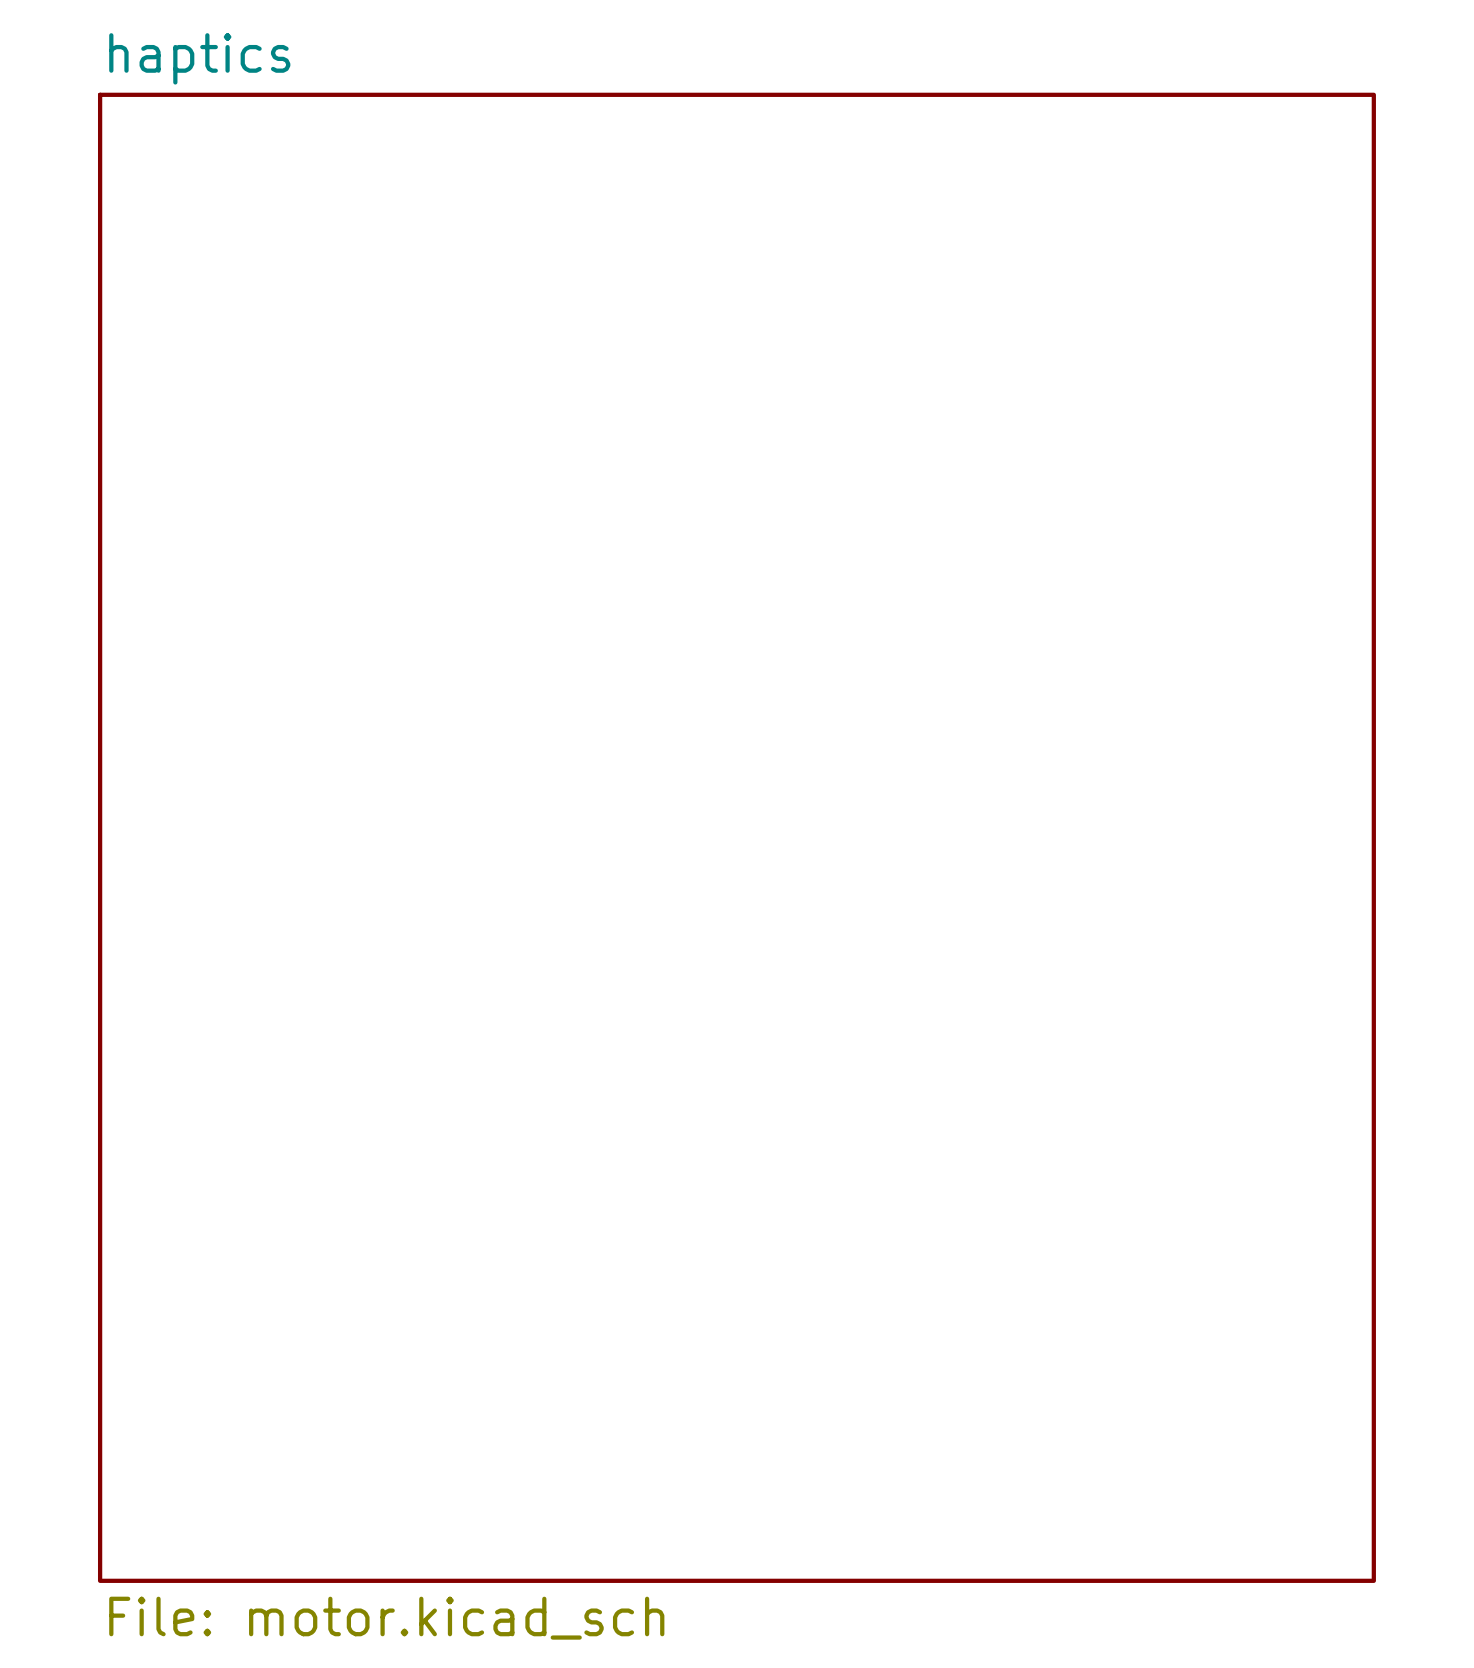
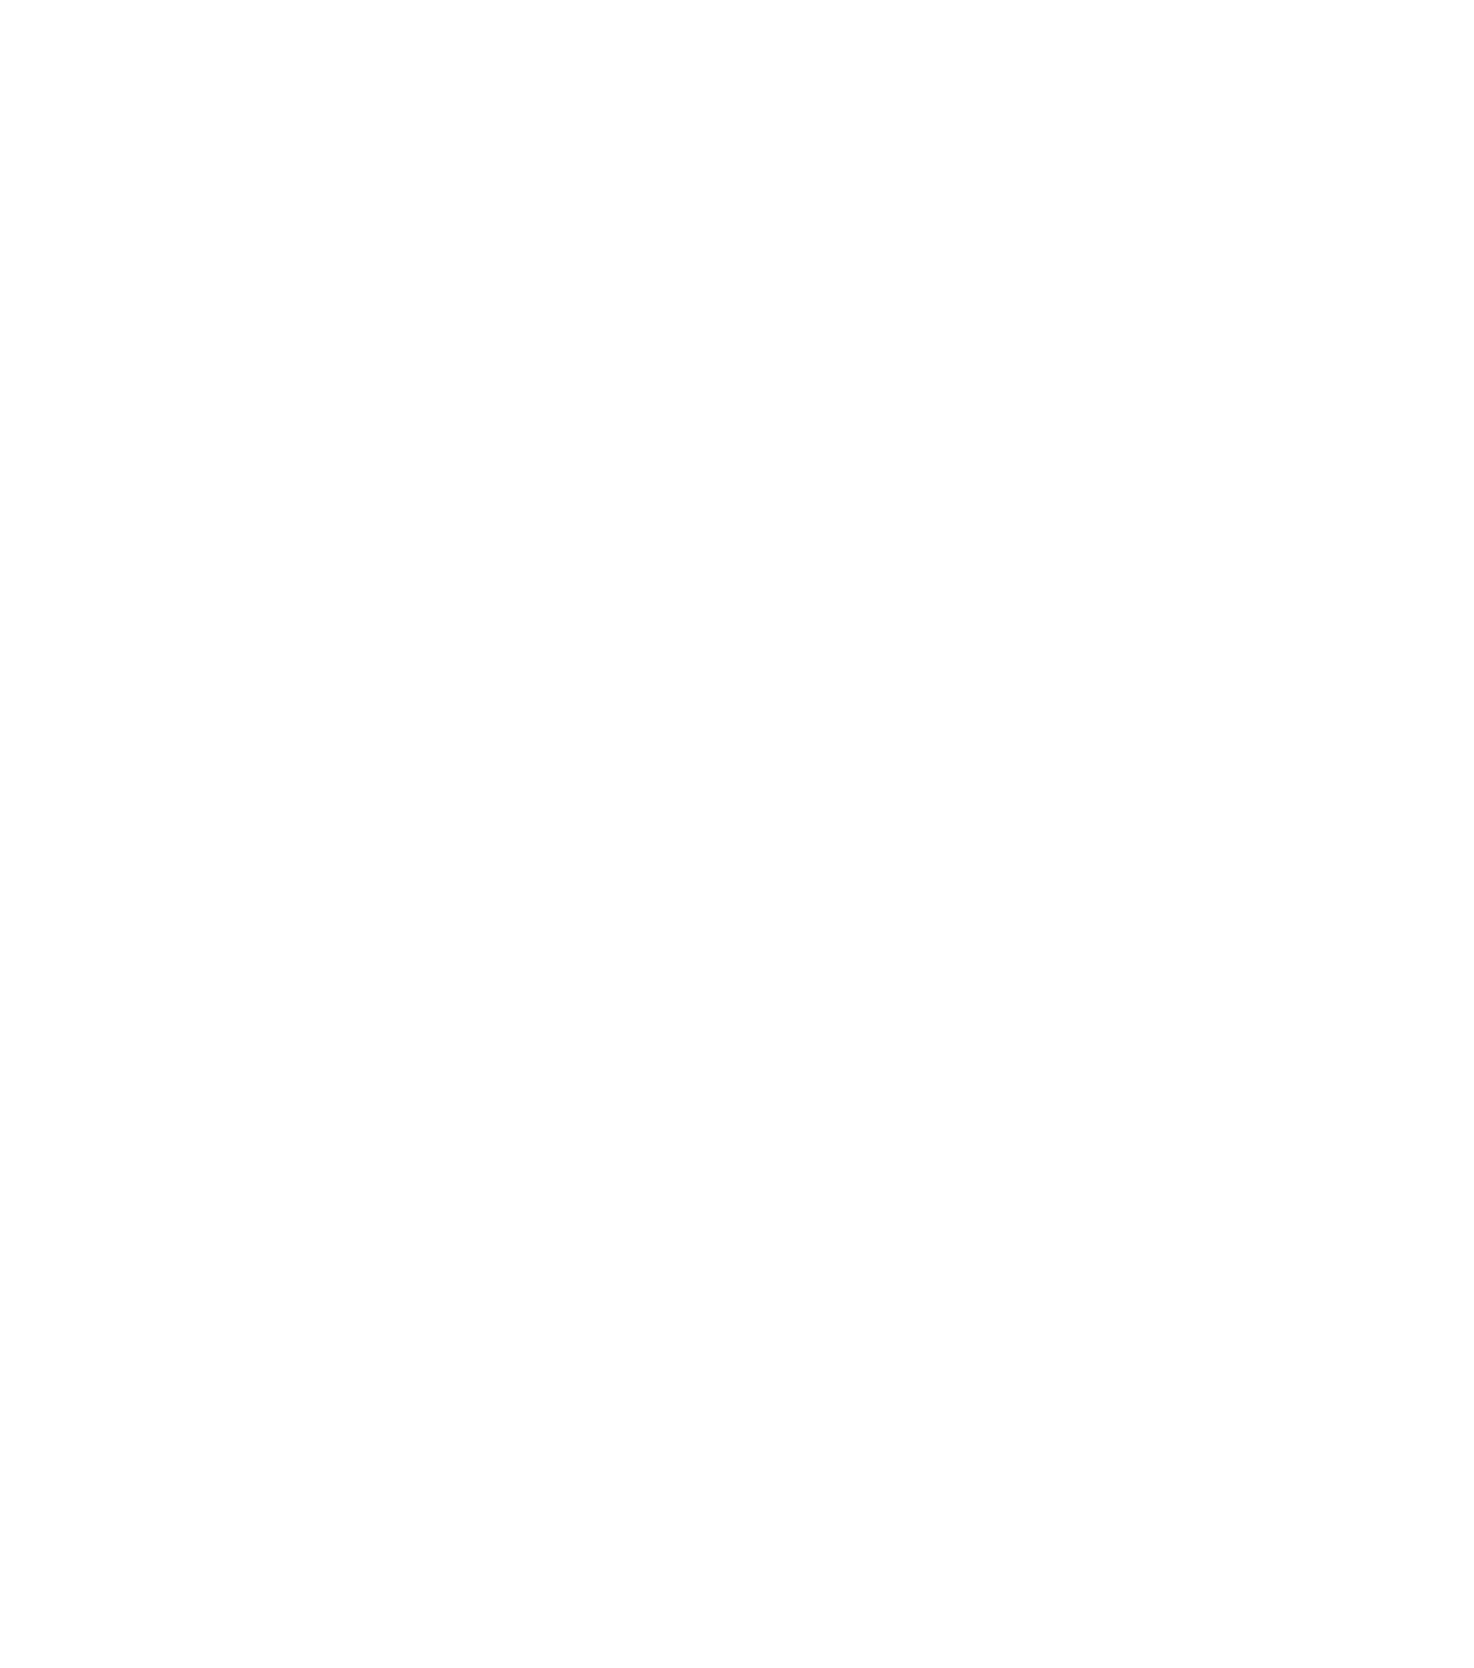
sheet haptics: File: motor.kicad_sch (736, 837) -> none

